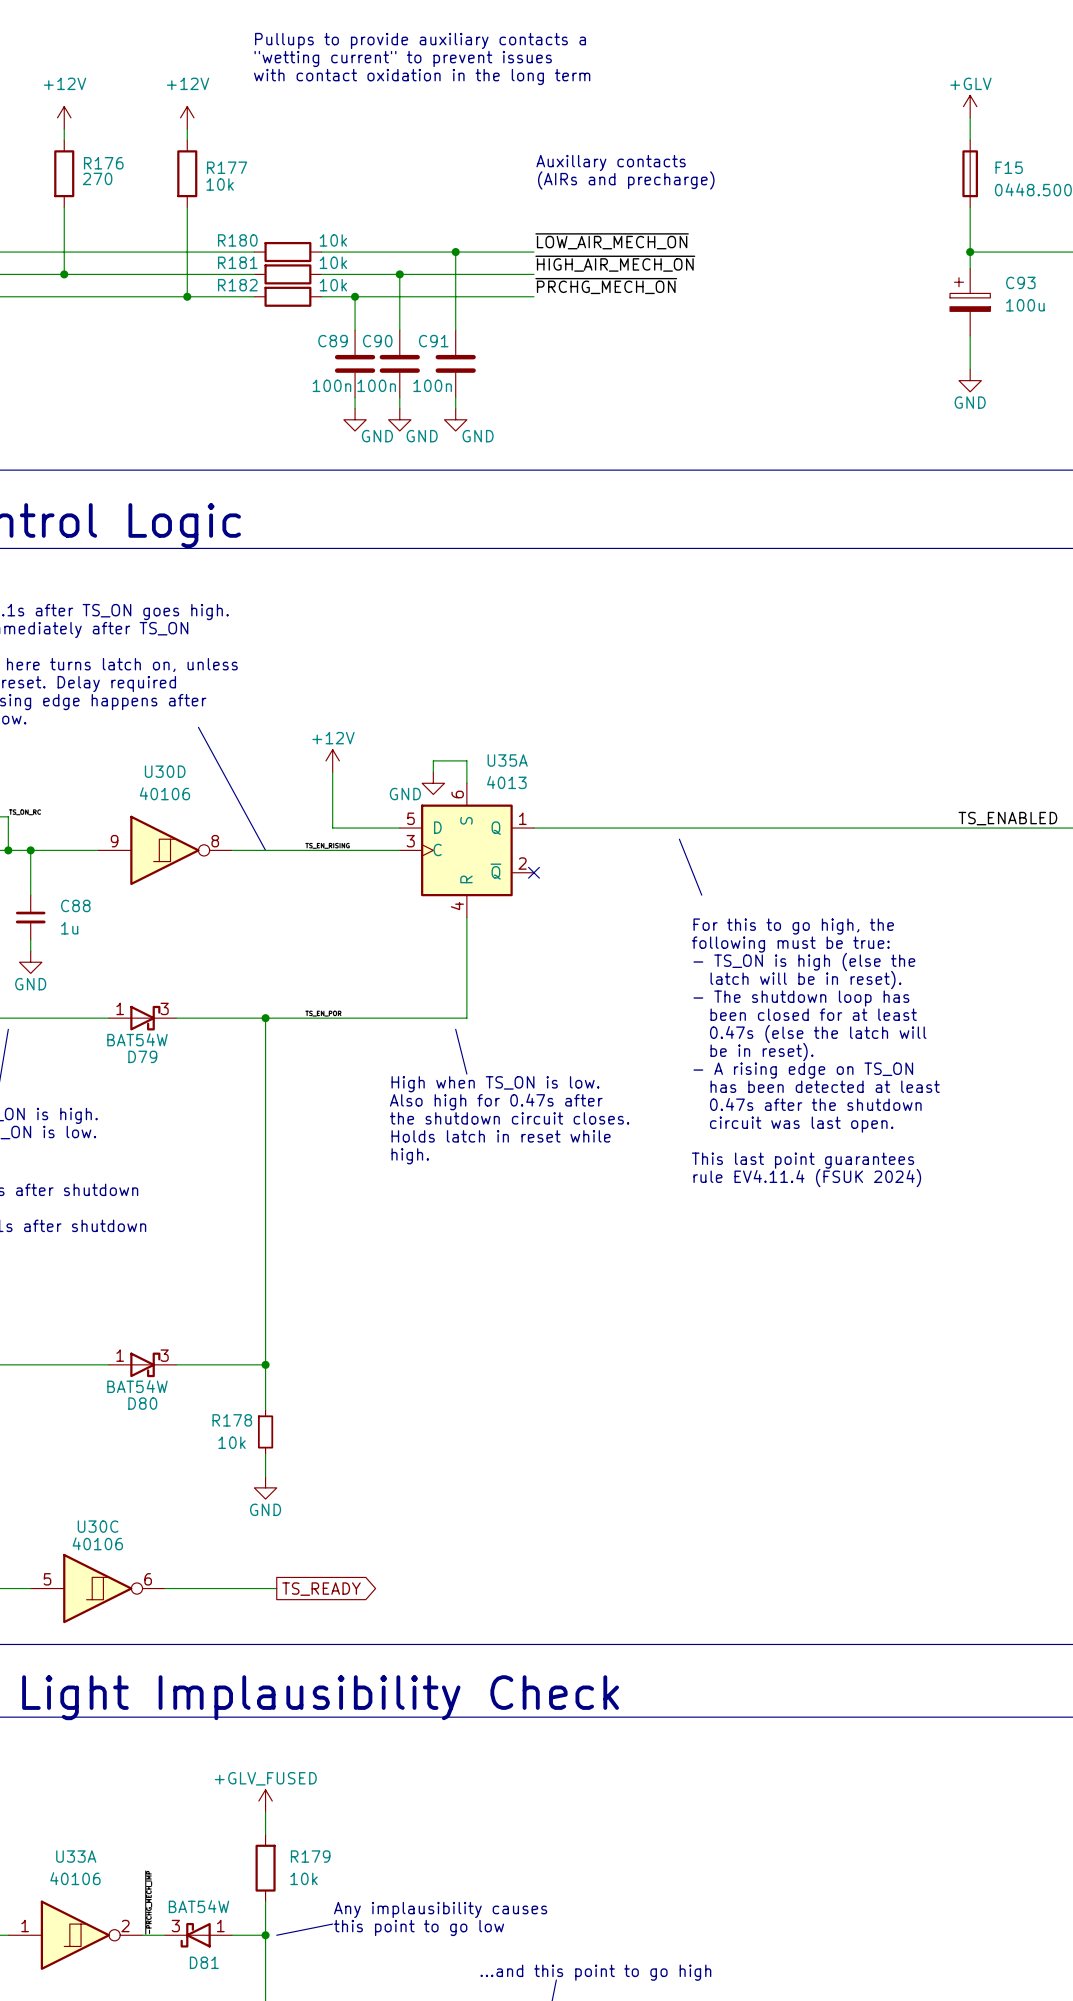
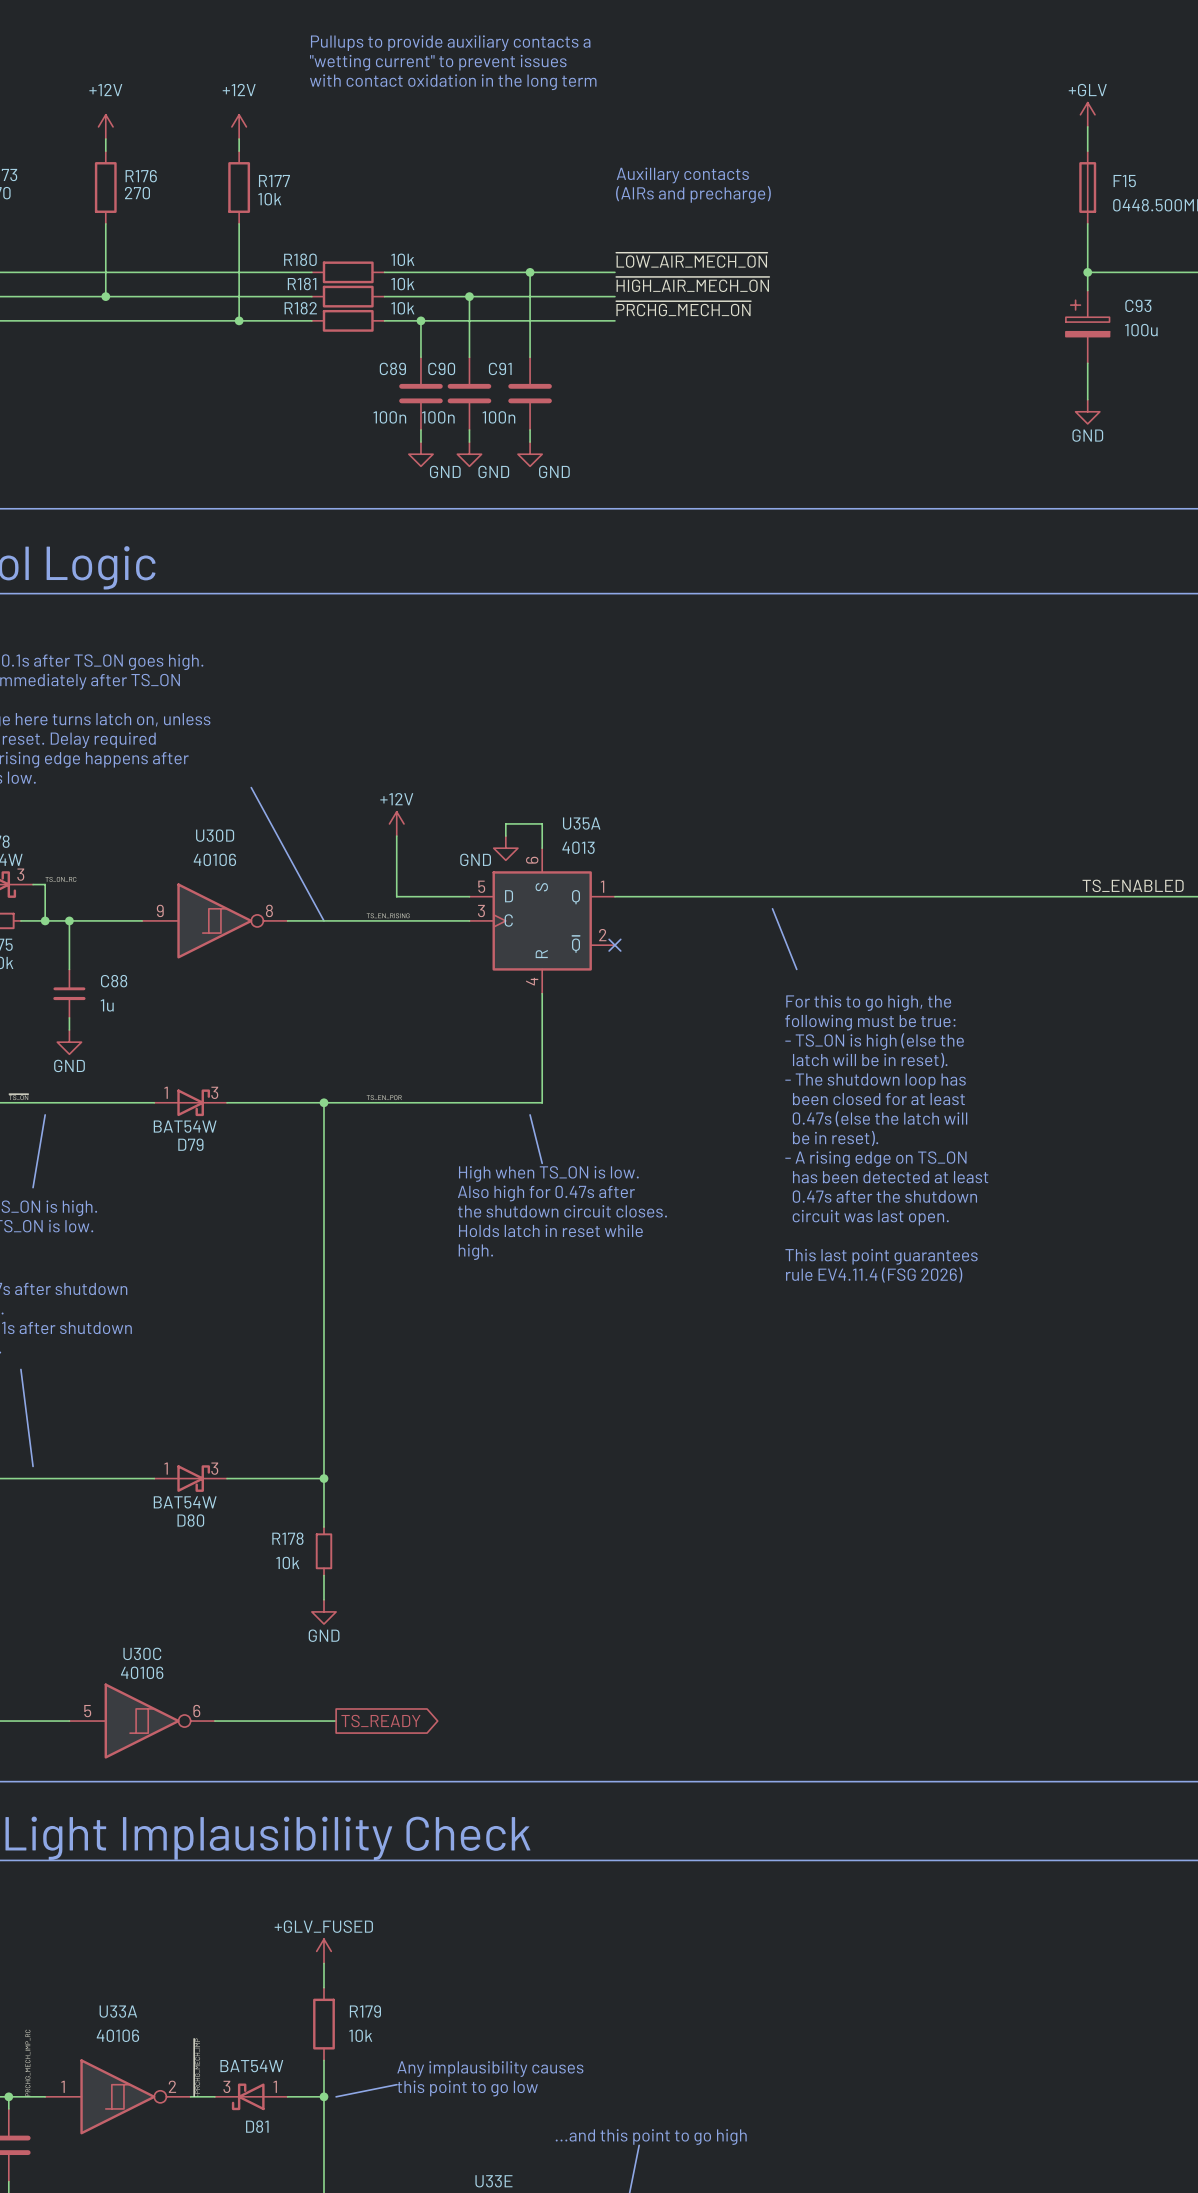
text: rule EV4.11.4 (FSUK 2024) (807, 1178) -> rule EV4.11.4 (FSG 2026) (874, 1275)

